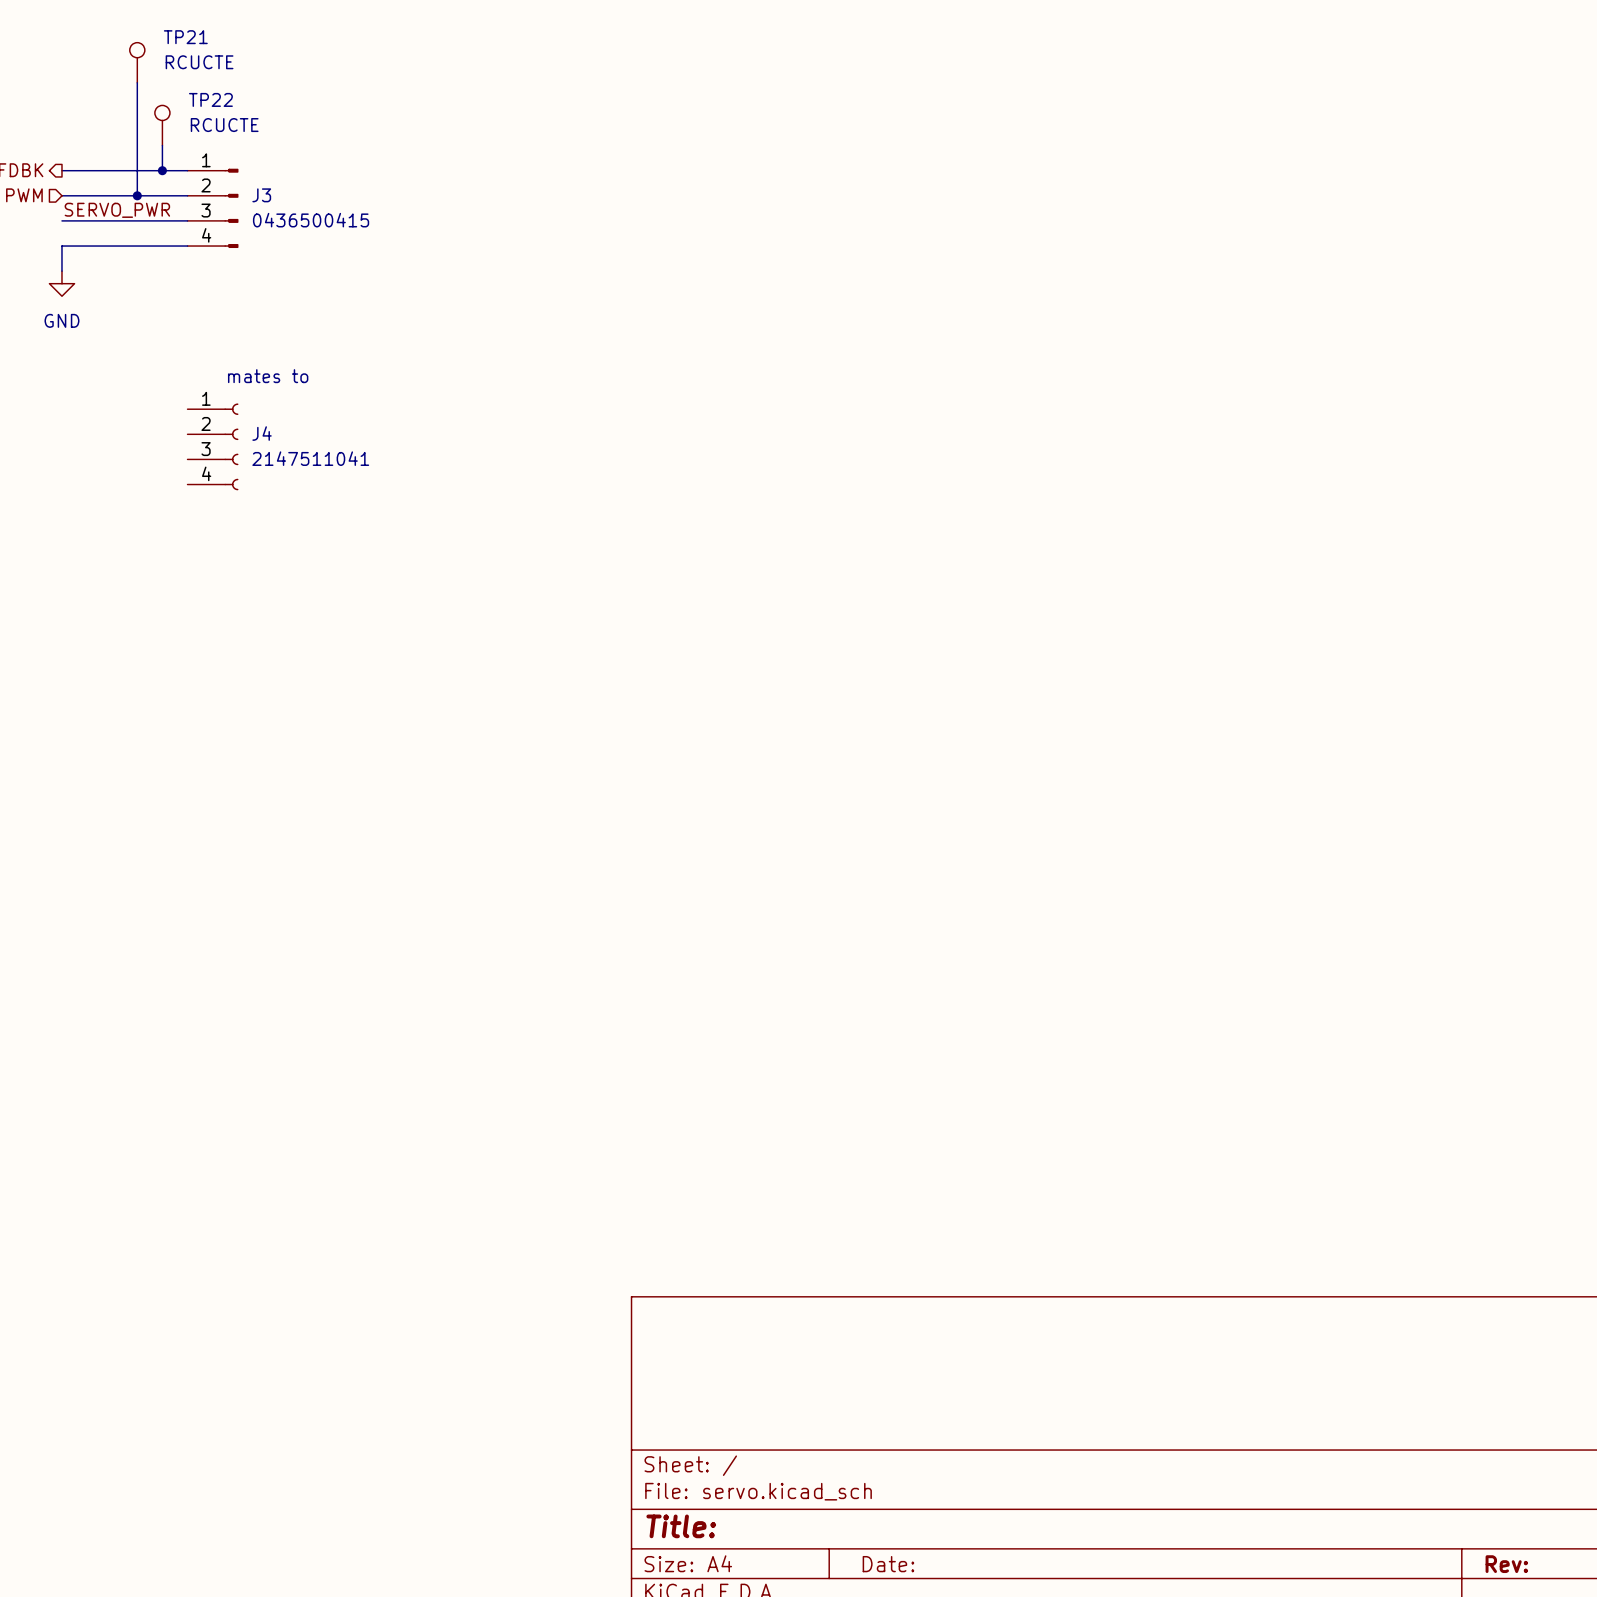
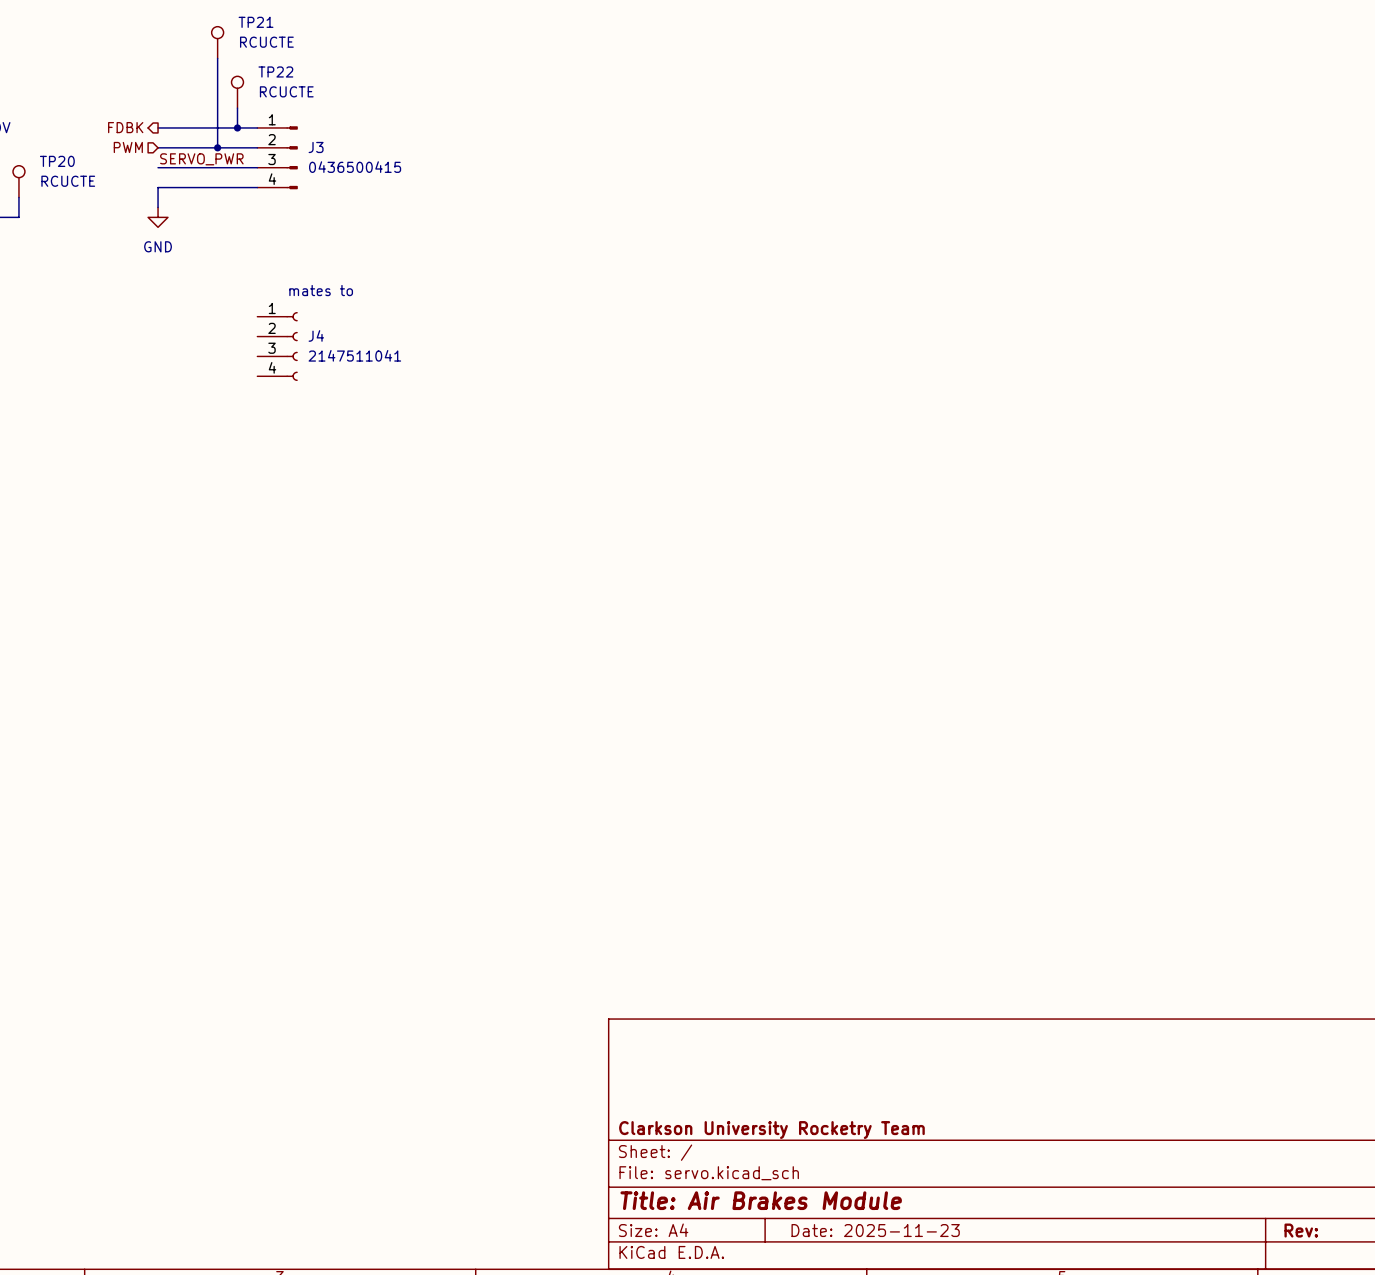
title block: none -> Clarkson University Rocketry Team (771, 1130)
title block: Title: (681, 1526) -> Title: Air Brakes Module (761, 1200)
title block: Date: (888, 1564) -> Date: 2025-11-23 (875, 1230)

